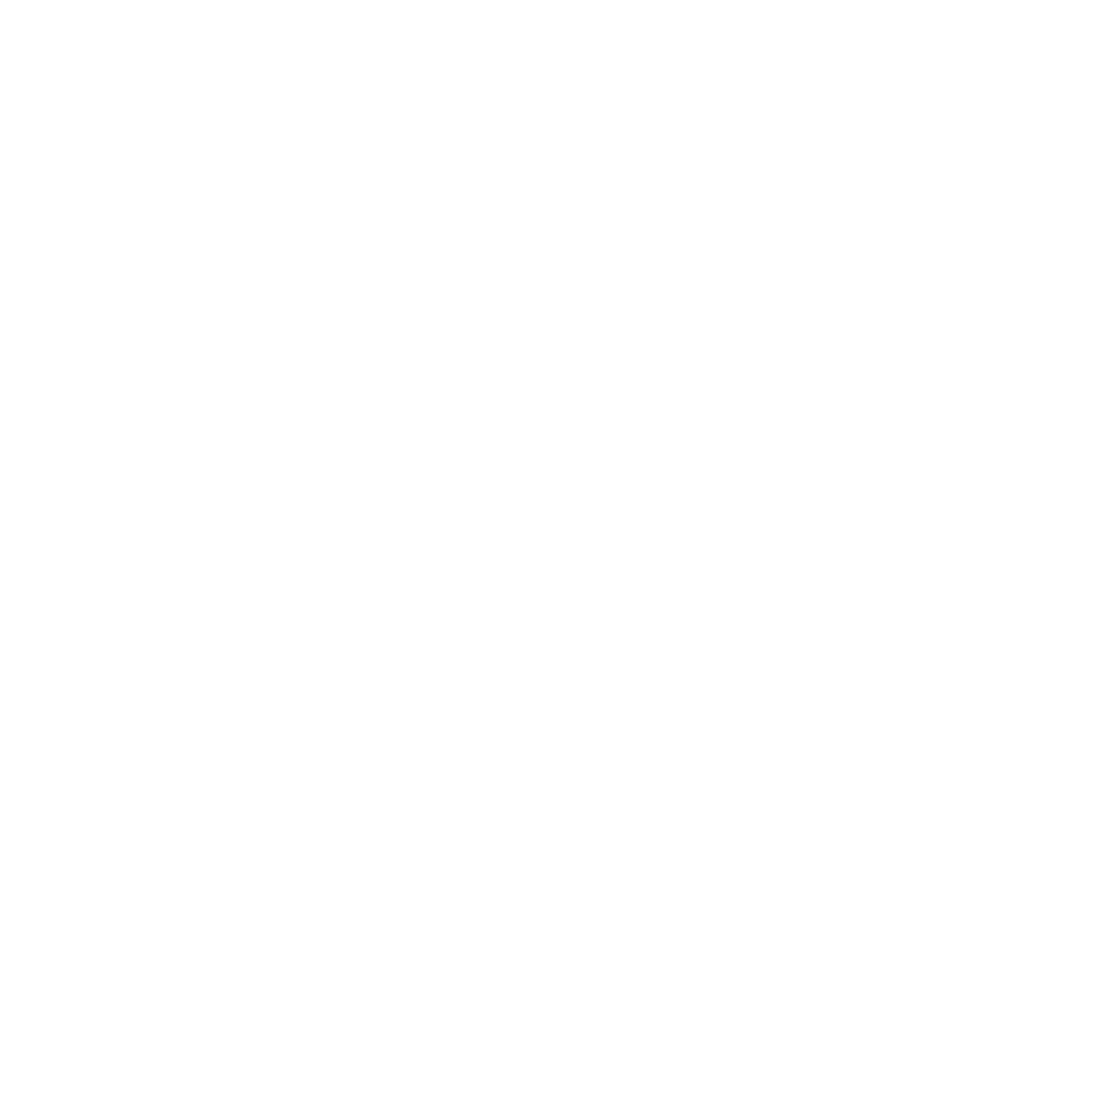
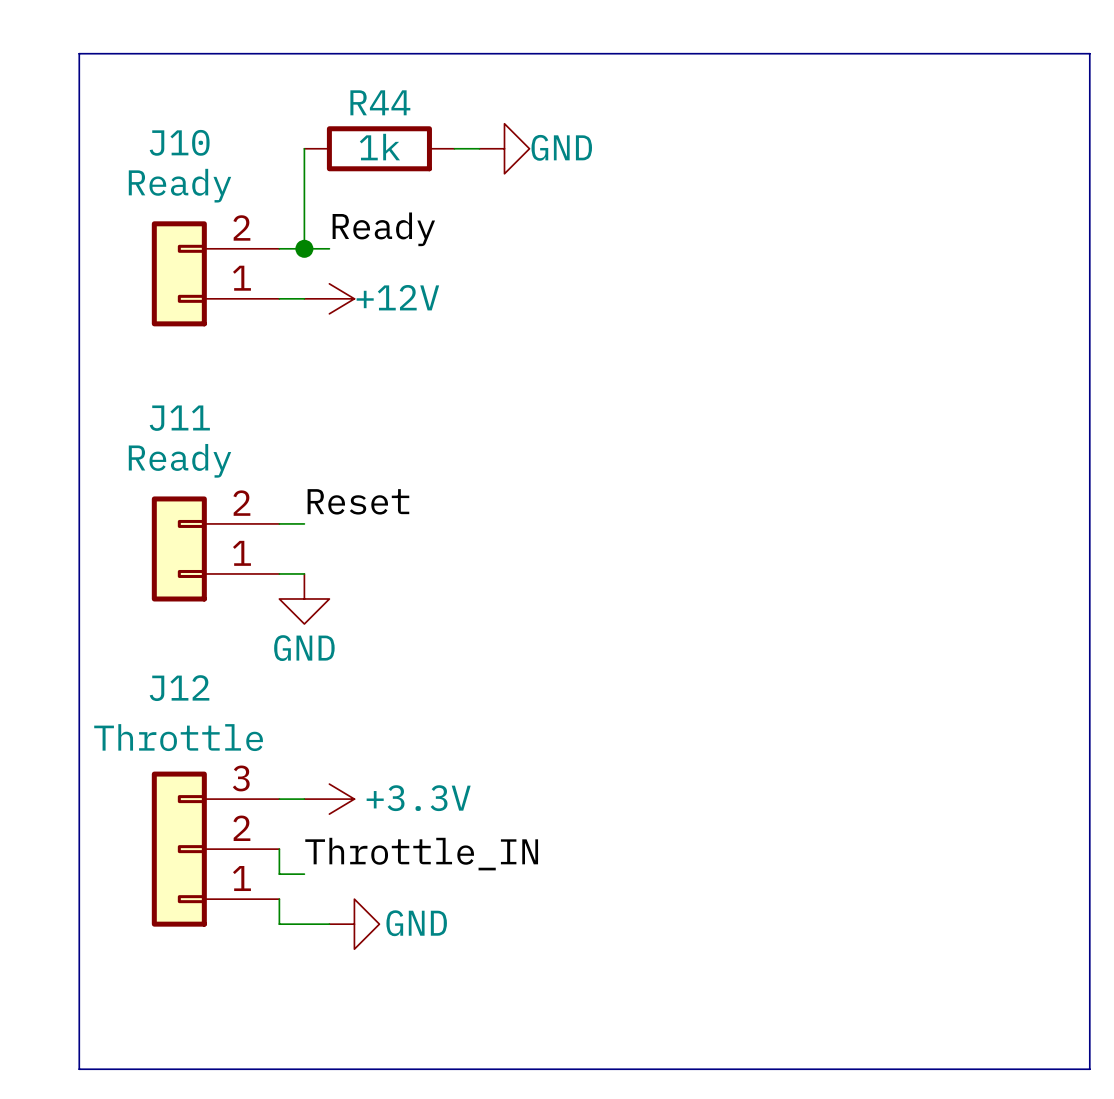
line: none -> (79, 53) (1089, 53) (1089, 1069) (79, 1069) (79, 53)
wire: none -> (304, 148) (304, 248)
R44: none -> 1k (379, 148)
wire: none -> (454, 148) (479, 148)
power symbol: none -> GND (504, 148)
label: none -> Ready (383, 229)
wire: none -> (279, 248) (329, 248)
junction: none -> (304, 248)
J10: none -> Ready (215, 273)
wire: none -> (279, 298) (304, 298)
power symbol: none -> +12V (329, 298)
label: none -> Reset (358, 501)
wire: none -> (279, 523) (304, 523)
J11: none -> Ready (215, 548)
wire: none -> (279, 573) (304, 573)
power symbol: none -> GND (304, 598)
wire: none -> (279, 799) (304, 799)
power symbol: none -> +3.3V (329, 799)
J12: none -> Throttle (215, 849)
wire: none -> (279, 849) (279, 874) (304, 874)
label: none -> Throttle_IN (421, 854)
wire: none -> (279, 899) (279, 924) (329, 924)
power symbol: none -> GND (354, 924)

